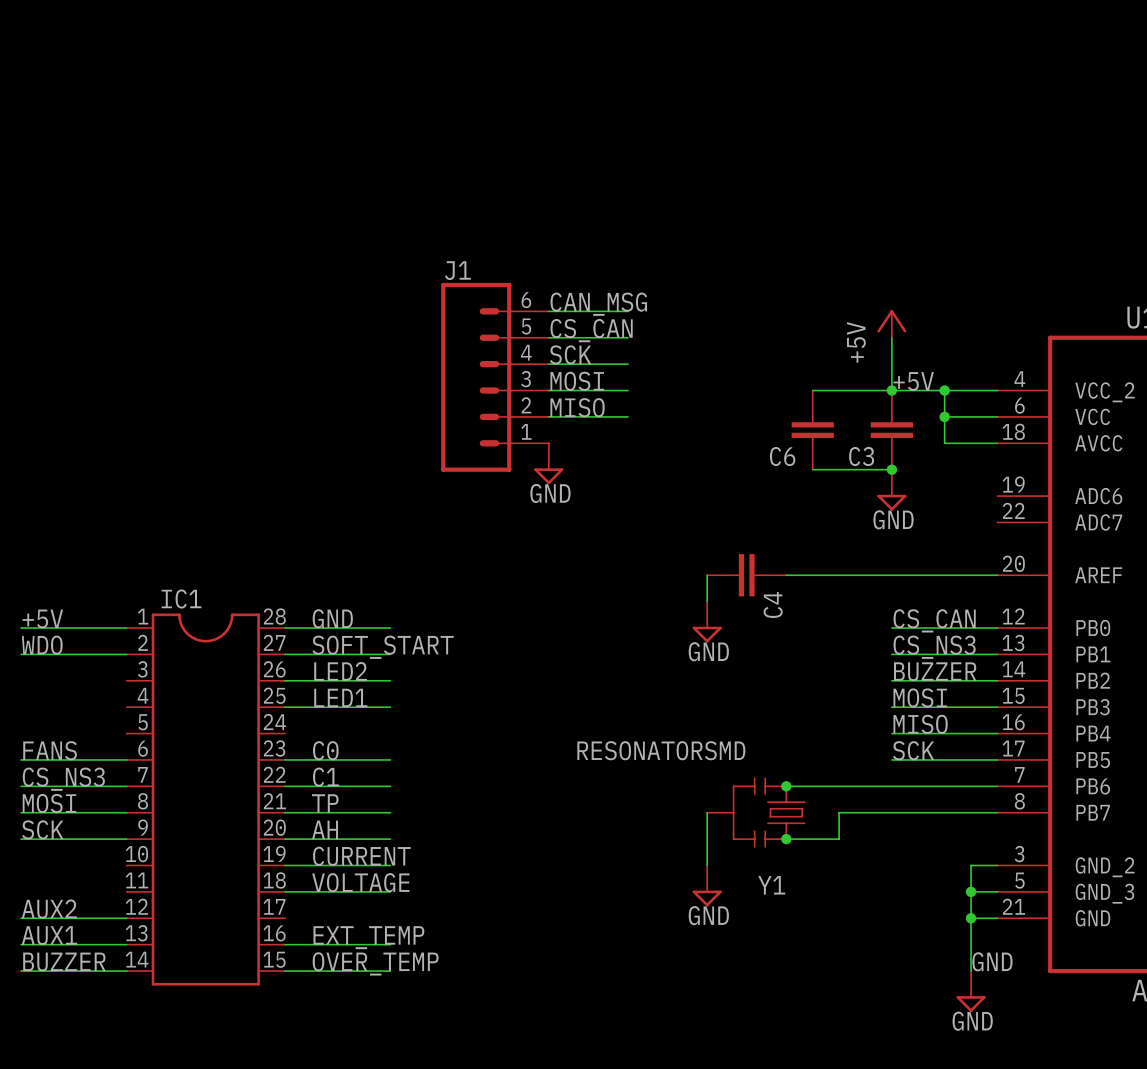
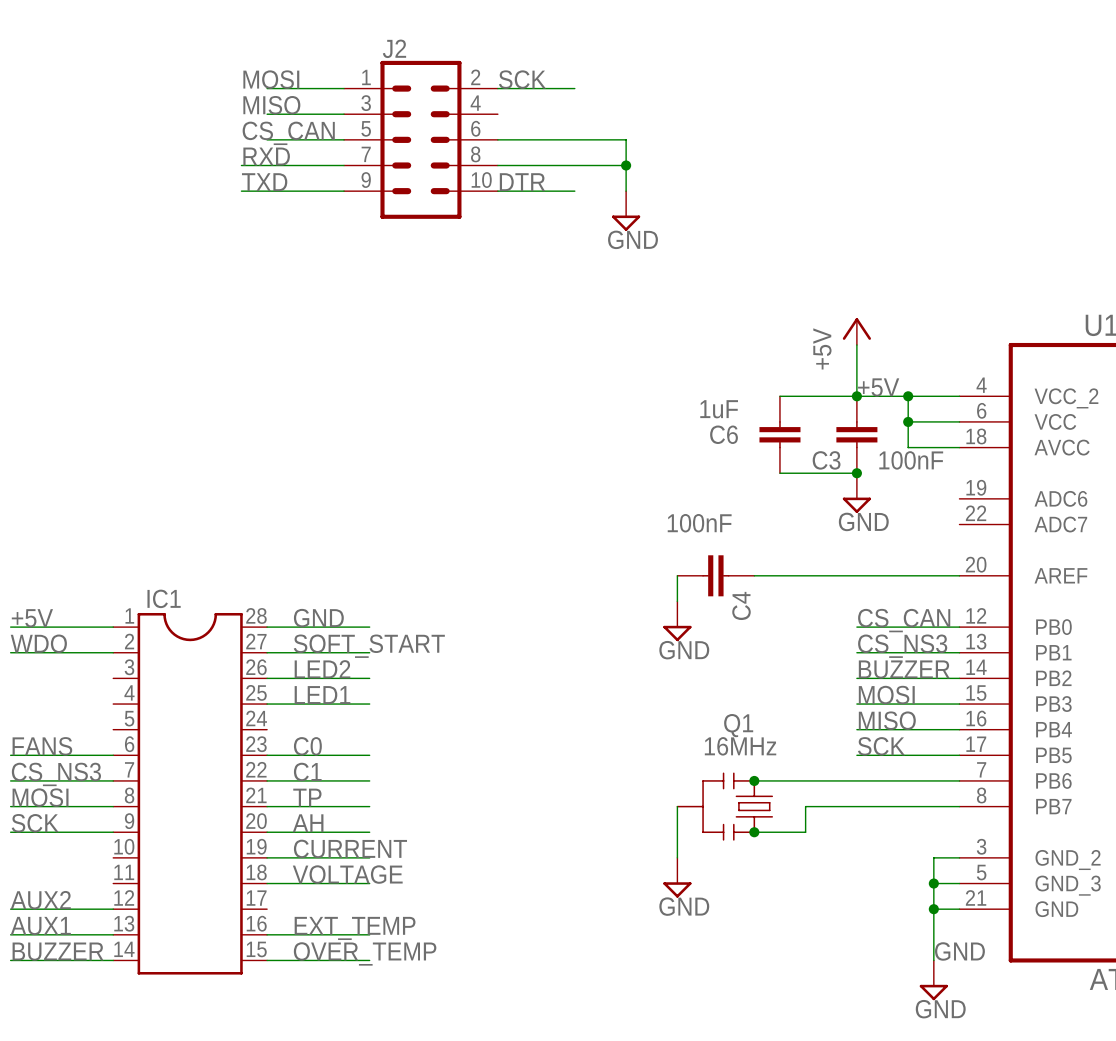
label: none -> MOSI (271, 79)
label: none -> SCK (522, 79)
wire: none -> (267, 88) (344, 88)
label: none -> MISO (271, 105)
wire: none -> (267, 114) (344, 114)
label: none -> CS_CAN (288, 133)
wire: none -> (267, 139) (344, 139)
J2: none -> (420, 139)
wire: none -> (497, 139) (626, 139) (626, 191)
label: none -> RXD (266, 156)
wire: none -> (241, 165) (344, 165)
wire: none -> (497, 165) (626, 165)
junction: none -> (626, 165)
label: none -> TXD (264, 182)
label: none -> DTR (522, 182)
wire: none -> (241, 191) (344, 191)
power symbol: none -> GND (626, 211)
label: CAN_MSG (598, 304) -> none
wire: (548, 311) (628, 311) -> (497, 88) (574, 88)
label: CS_CAN (591, 330) -> none
wire: (548, 337) (628, 337) -> none
label: SCK (570, 354) -> none
wire: (548, 364) (628, 364) -> none
J1: (495, 377) -> none
label: MOSI (577, 381) -> none
wire: (548, 390) (628, 390) -> none
C6 value: none -> 1uF (719, 409)
label: MISO (577, 407) -> none
wire: (548, 416) (628, 416) -> (497, 191) (574, 191)
C6 name position: C6 (782, 456) -> C6 (724, 434)
C3 value: none -> 100nF (911, 460)
power symbol: GND (548, 463) -> none
C4 value: none -> 100nF (699, 523)
Y1 value: RESONATORSMD (661, 750) -> 16MHz (740, 746)
Y1 name: Y1 (771, 885) -> Q1 (738, 725)

